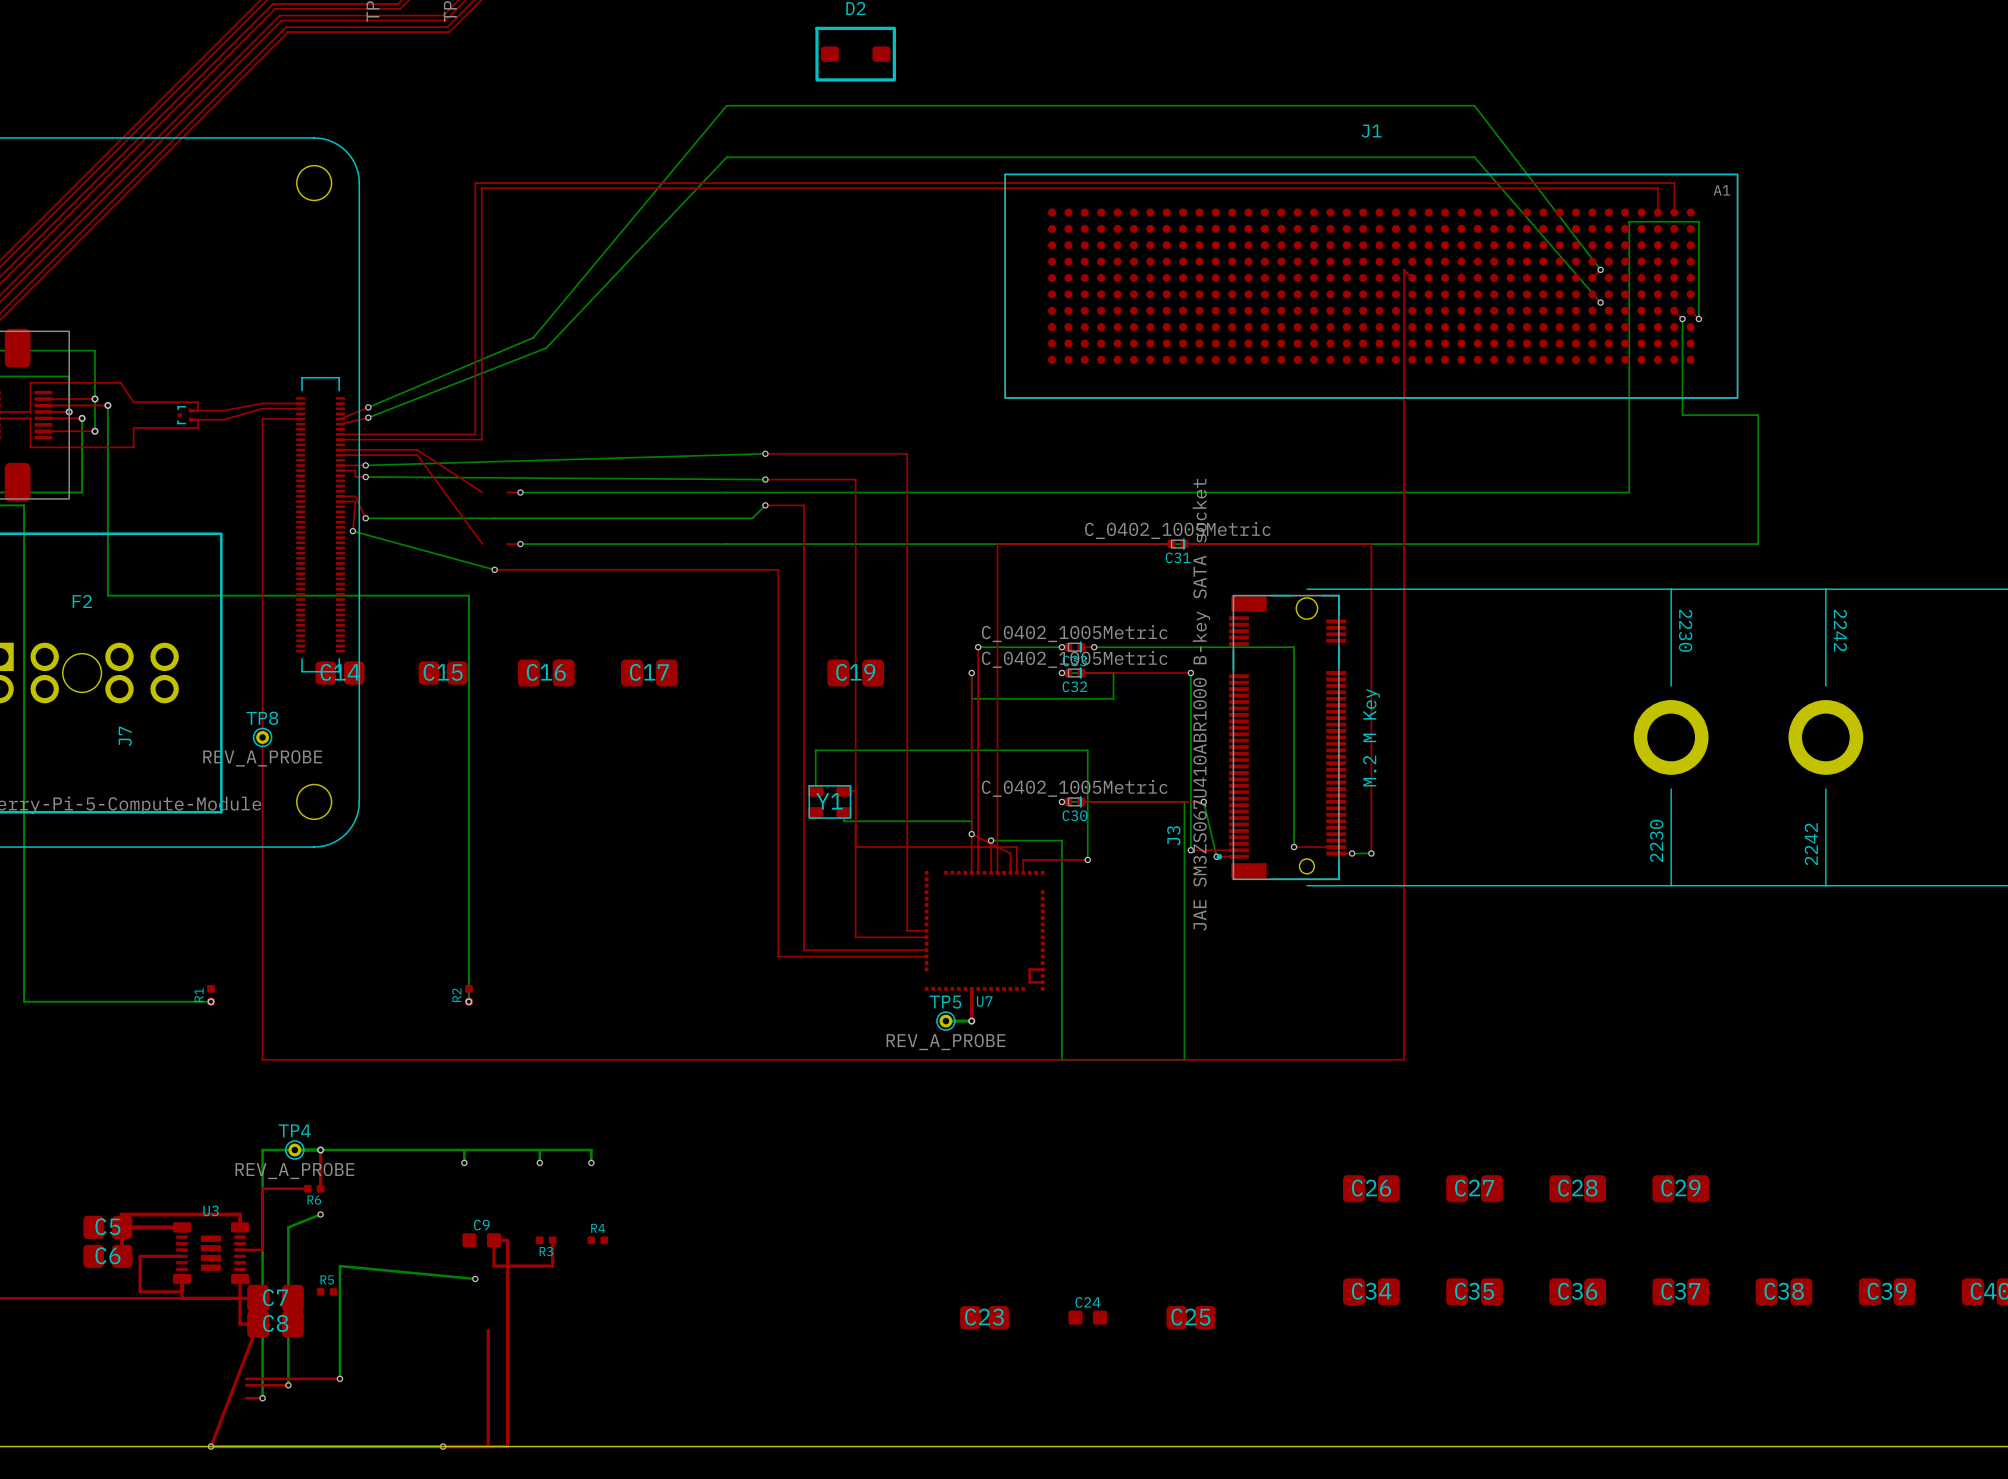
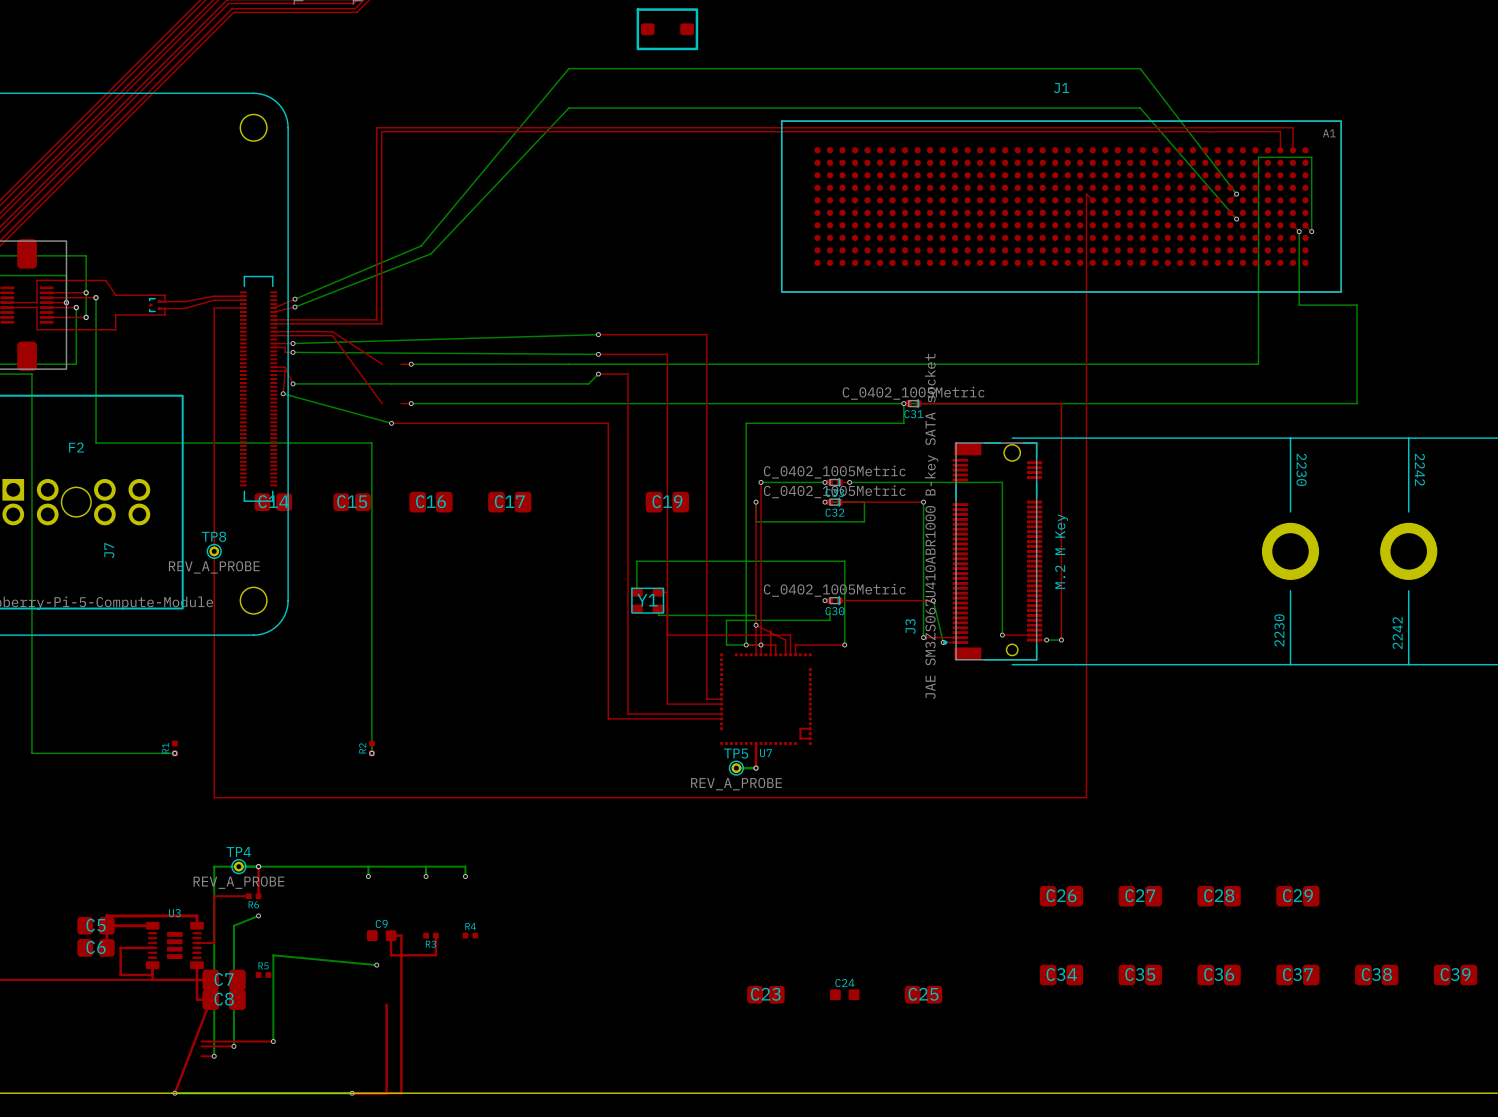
top track: (1165, 544) (997, 544) (997, 859) -> (746, 644) (775, 644)
bottom track: none -> (903, 403) (903, 423) (746, 423) (746, 644)
via: none -> (903, 403)
bottom track: (1061, 801) (1184, 801) (1184, 1059) (1061, 1059) (1061, 840) (991, 840) -> none
bottom track: none -> (829, 610) (829, 620) (726, 620) (726, 644) (760, 644)
via: (991, 840) -> none
via: none -> (746, 644)
via: none -> (760, 644)

